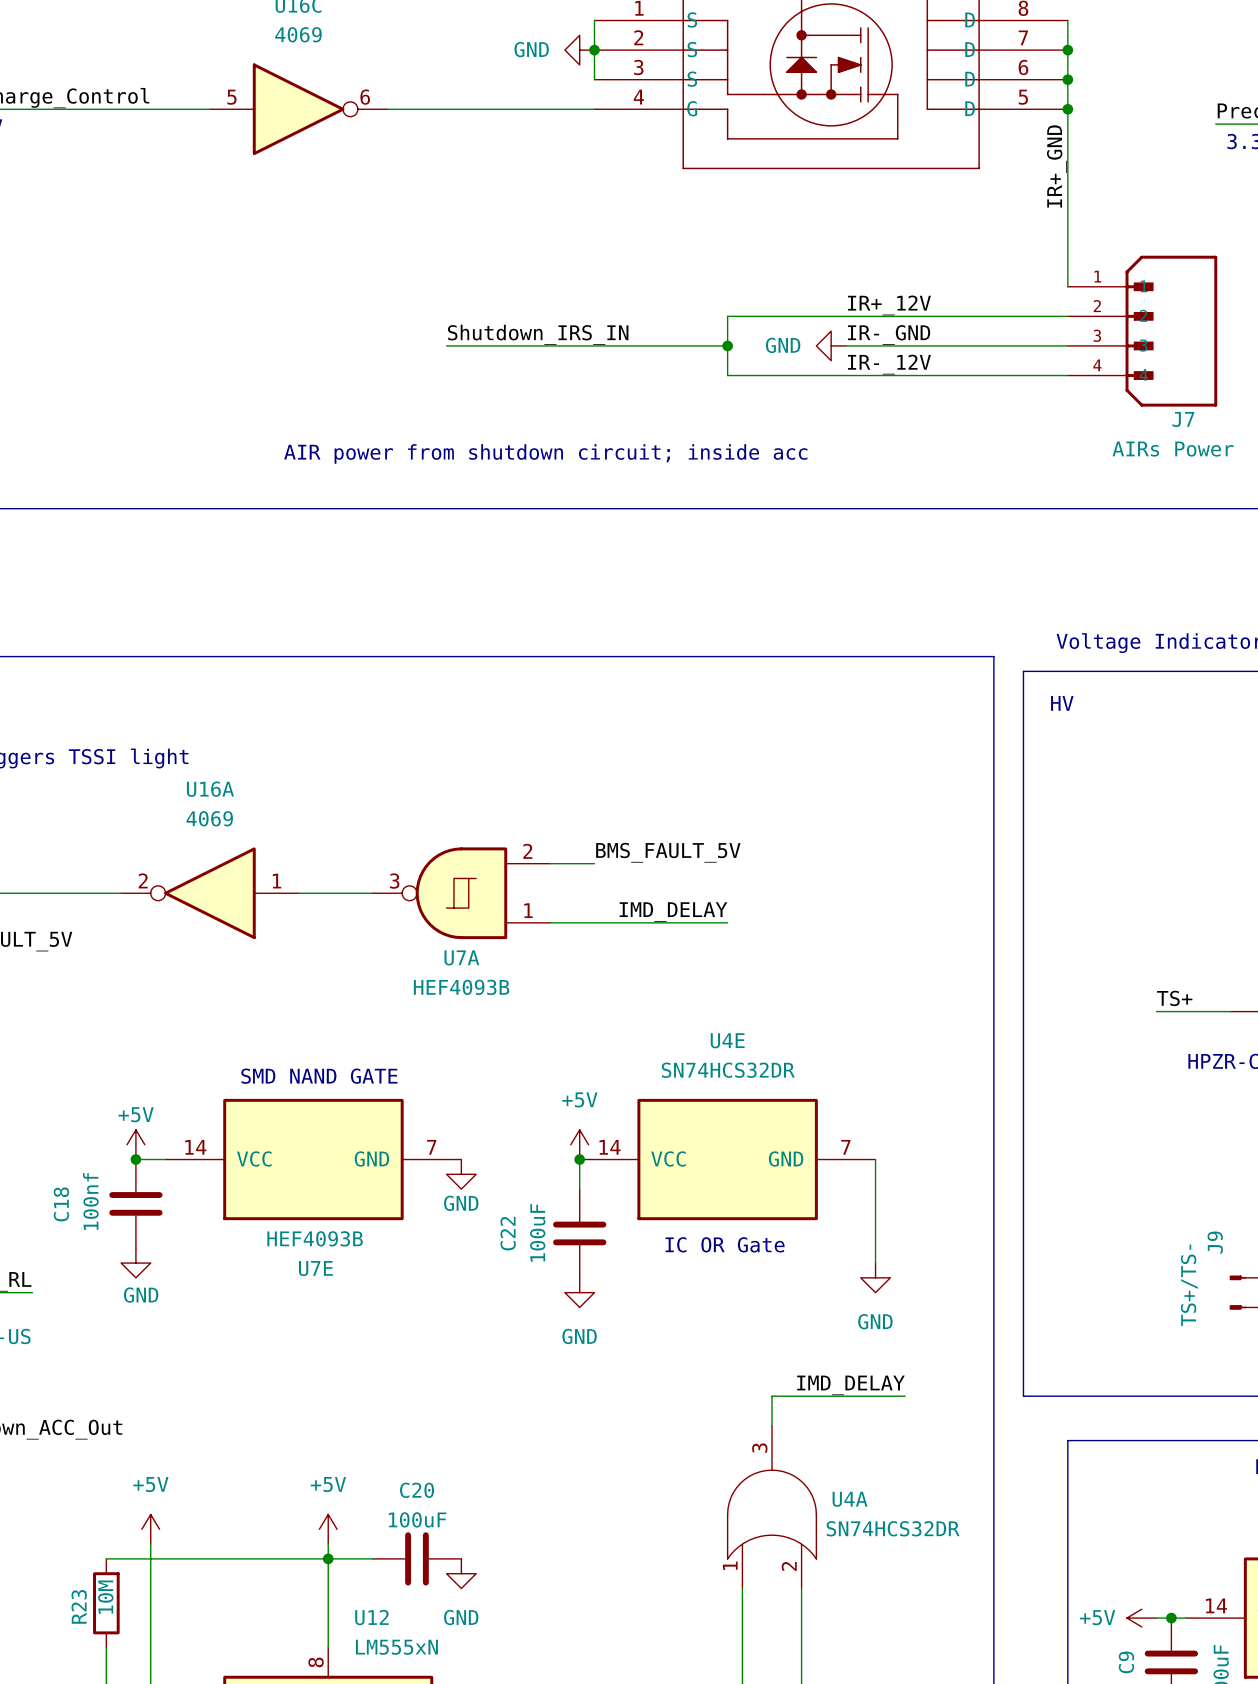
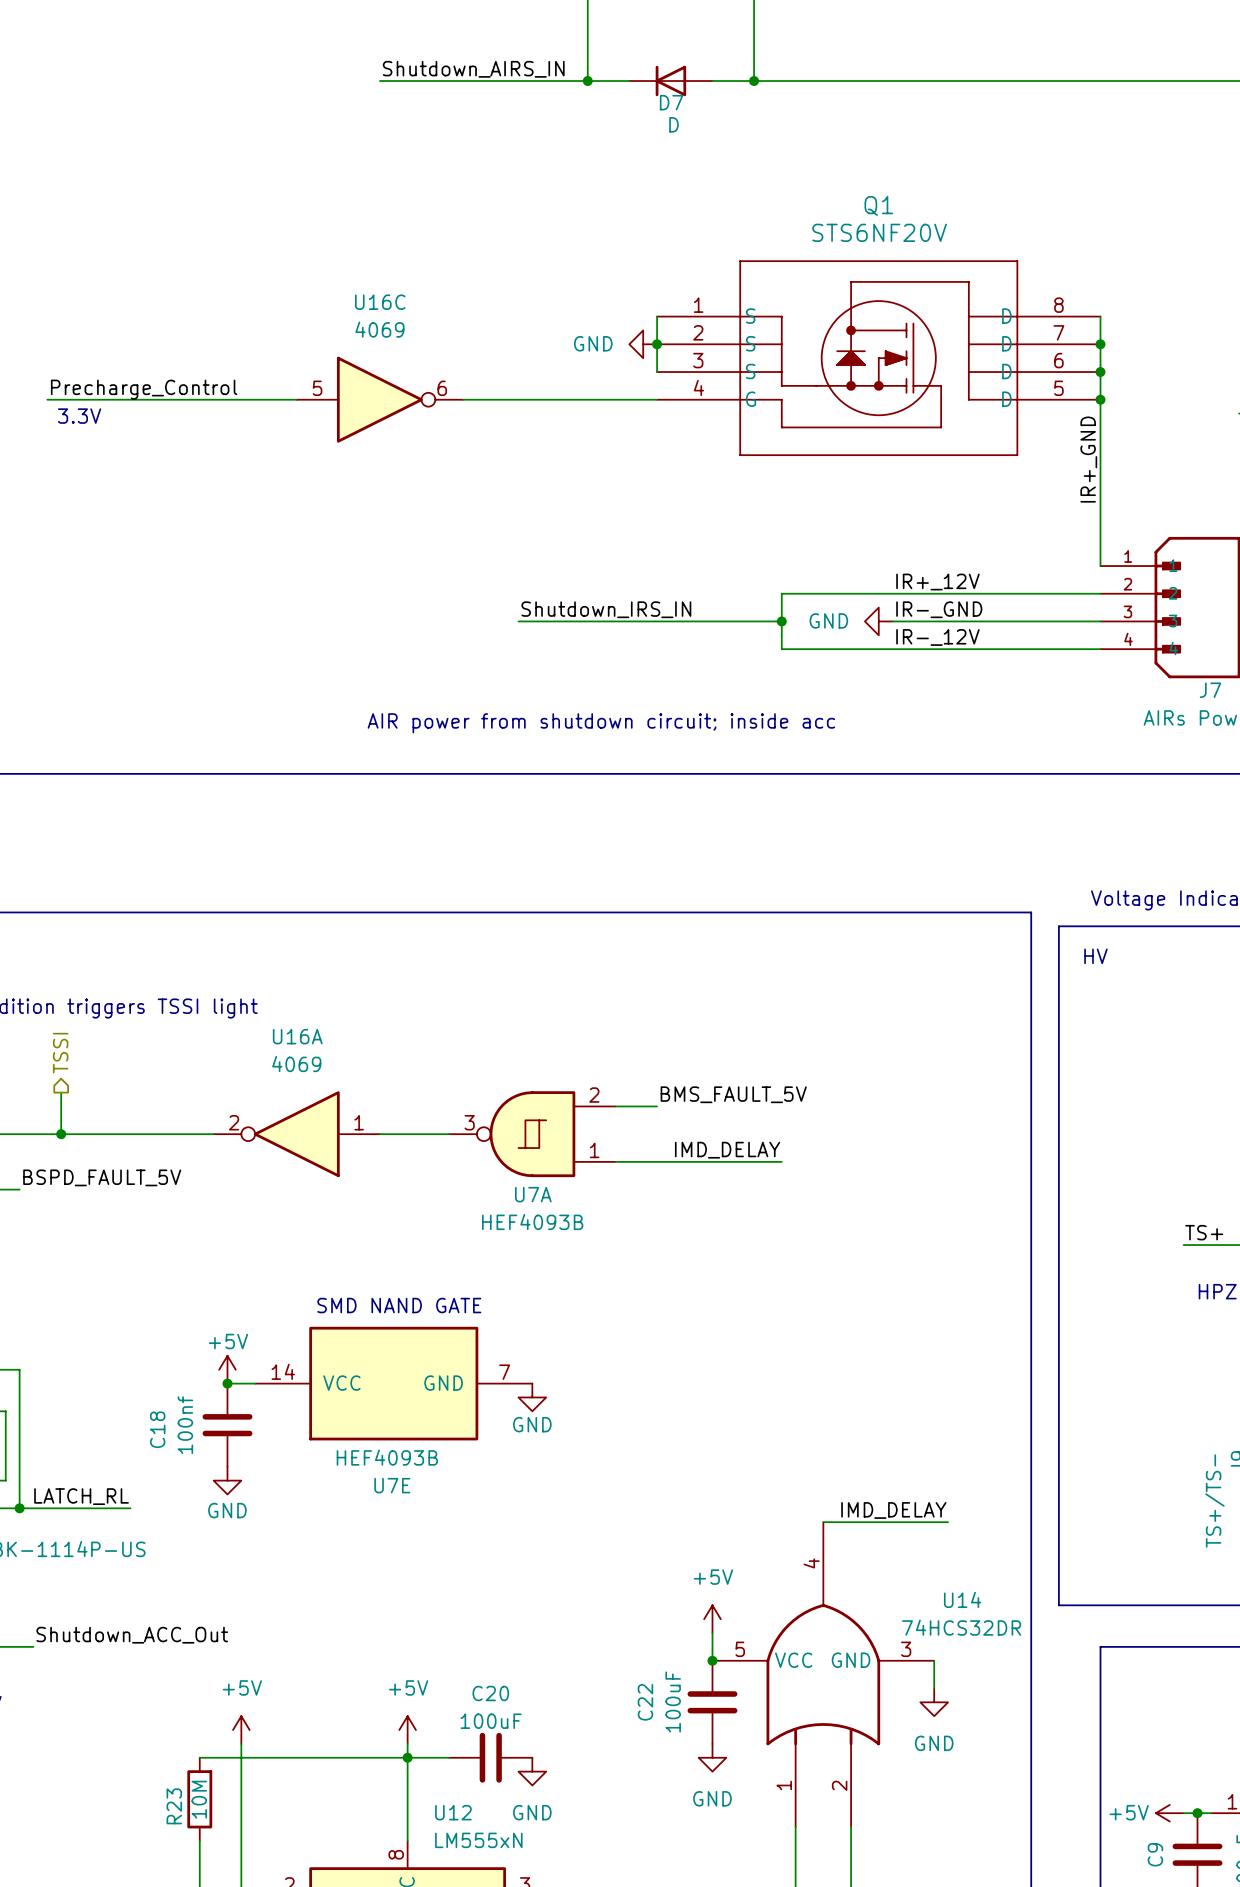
power symbol position: +5V (579, 1144) -> +5V (712, 1619)
wire: (579, 1159) (579, 1189) -> (712, 1633) (712, 1660)
junction: (579, 1159) -> none
U4E: SN74HCS32DR (727, 1159) -> none
wire: (875, 1159) (875, 1263) -> none
C22 position: (579, 1233) -> (712, 1702)
text: IC OR Gate (725, 1244) -> none
power symbol: GND (875, 1277) -> none
power symbol: GND (579, 1292) -> none
wire: none -> (823, 1522) (948, 1522)
label position: IMD_DELAY (850, 1385) -> IMD_DELAY (893, 1510)
wire: (905, 1396) (772, 1396) (772, 1425) -> none
junction: none -> (712, 1660)
wire: none -> (934, 1660) (934, 1688)
U14: none -> 74HCS32DR (823, 1674)
power symbol: none -> GND (934, 1702)
U4A: SN74HCS32DR (772, 1507) -> none
power symbol: none -> GND (712, 1757)

